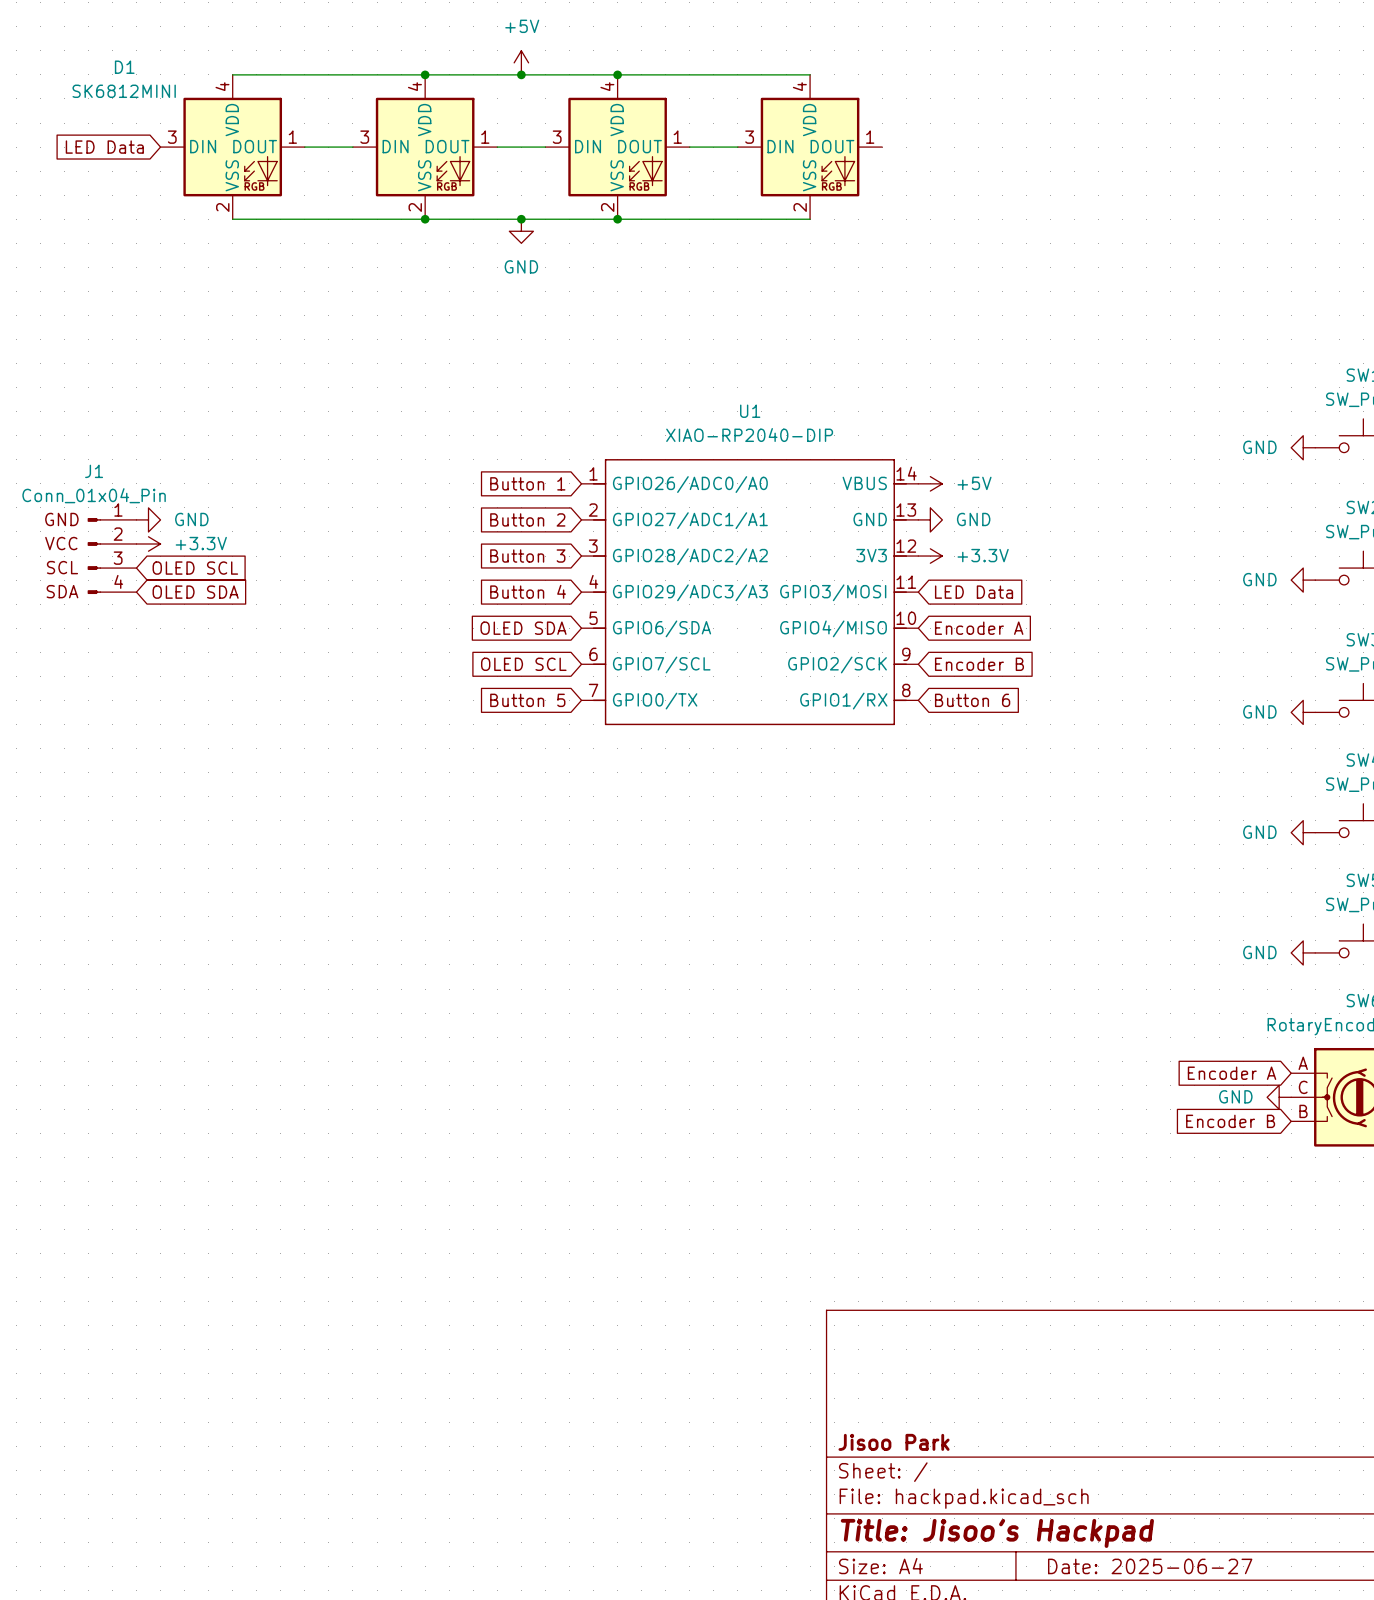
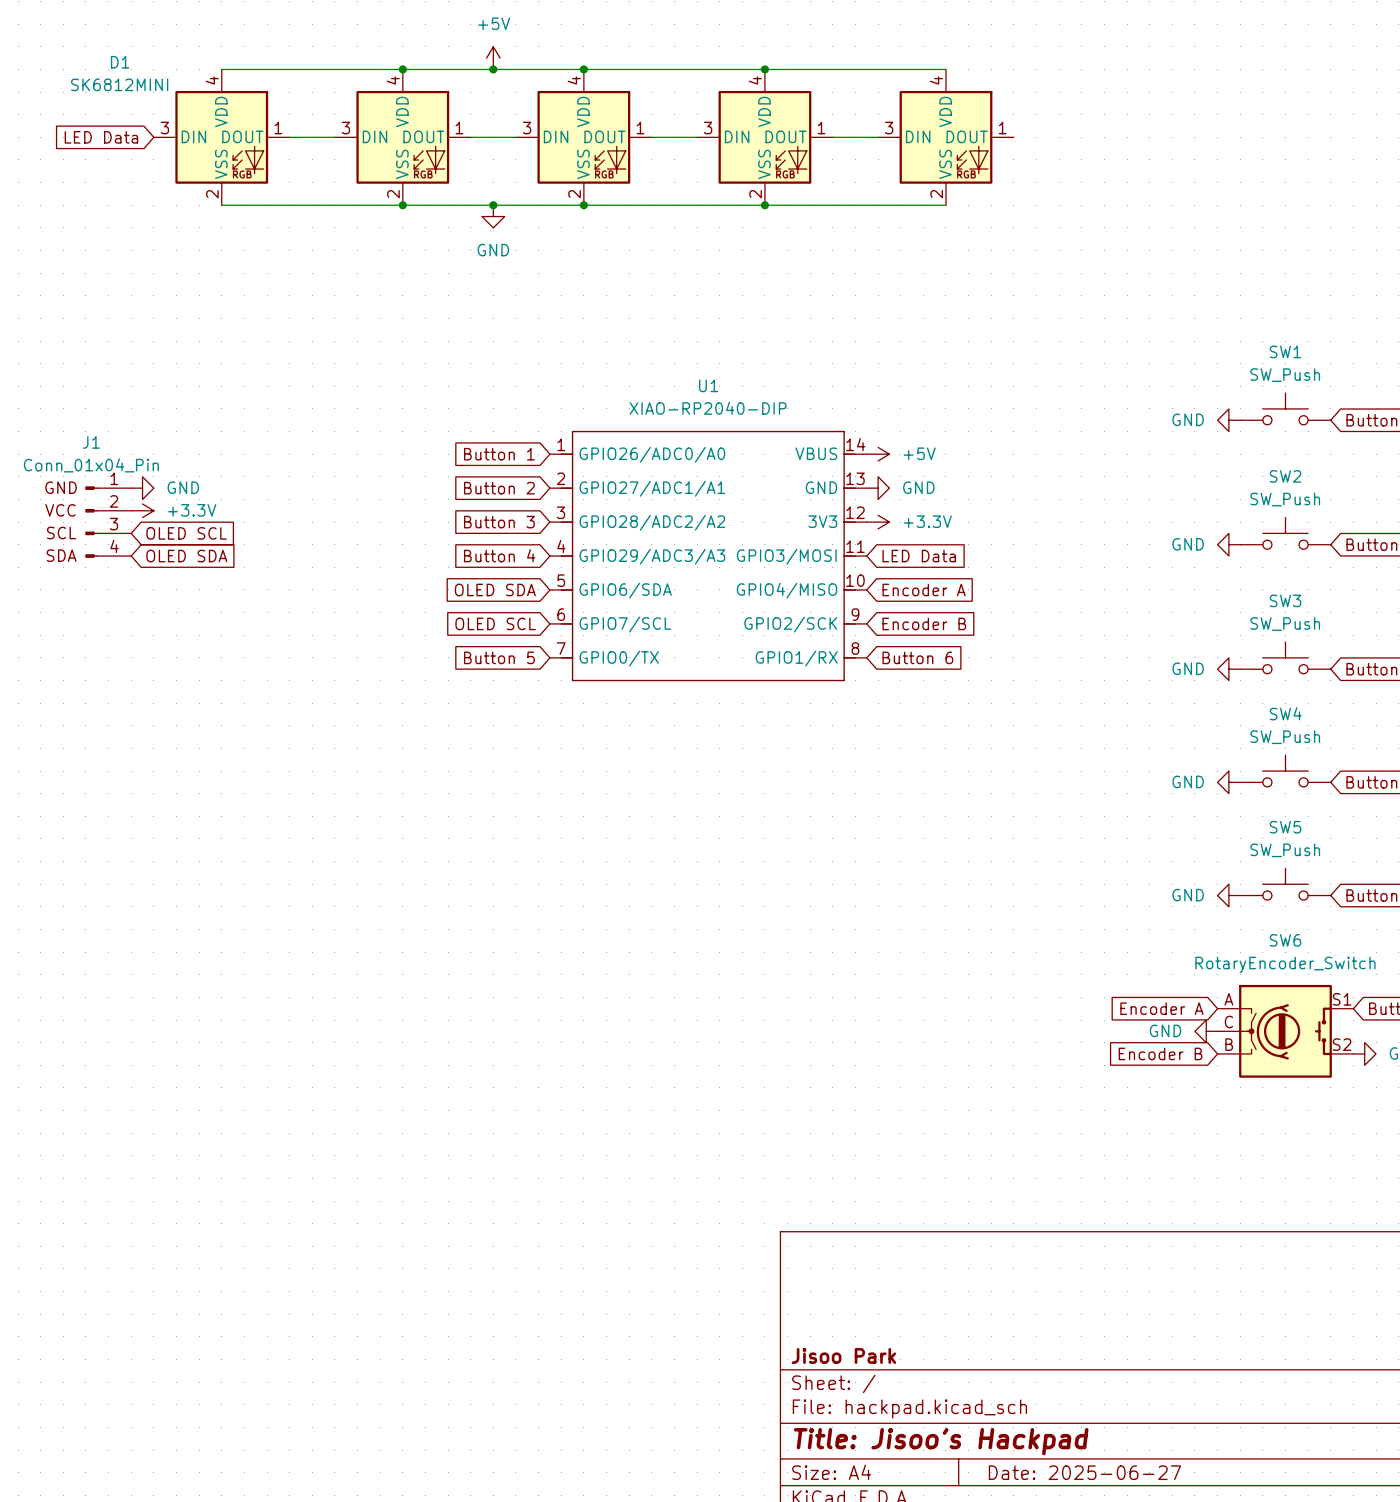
wire: none -> (764, 69) (945, 69)
junction: none -> (764, 69)
wire: none -> (832, 137) (878, 137)
part: none -> (945, 137)
wire: none -> (764, 205) (945, 205)
junction: none -> (764, 205)

